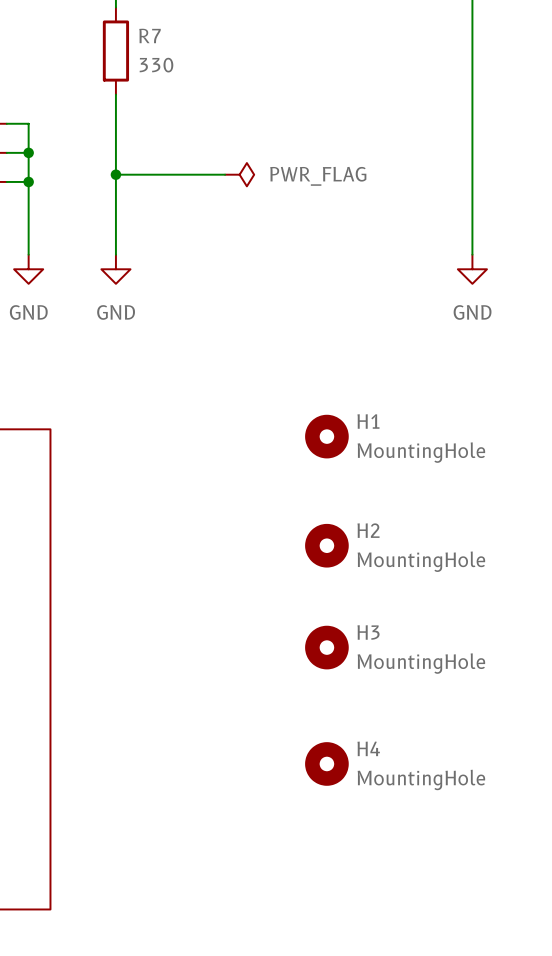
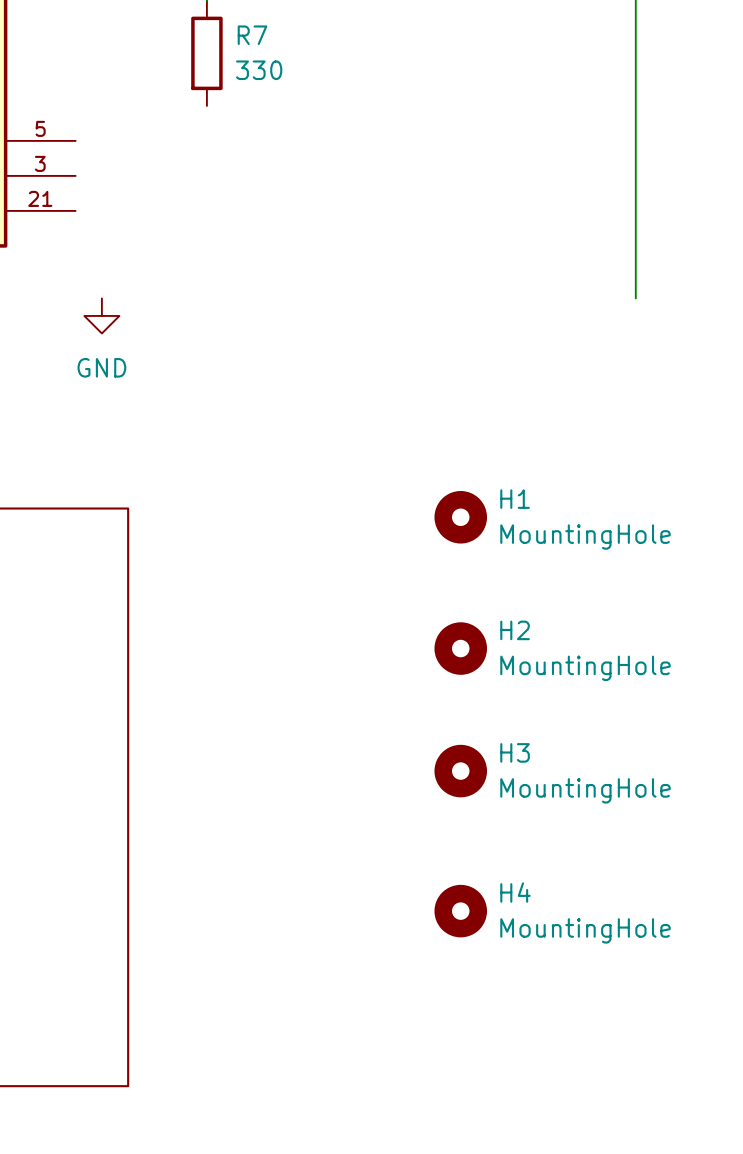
wire: (115, 94) (115, 254) -> none
wire: (6, 123) (28, 123) (28, 254) -> none
wire: (6, 152) (28, 152) -> none
junction: (28, 152) -> none
wire: (115, 174) (225, 174) -> none
junction: (115, 174) -> none
power symbol: PWR_FLAG (239, 174) -> none
wire: (6, 181) (28, 181) -> none
junction: (28, 181) -> none
power symbol: GND (115, 269) -> none
power symbol: GND (472, 269) -> none

